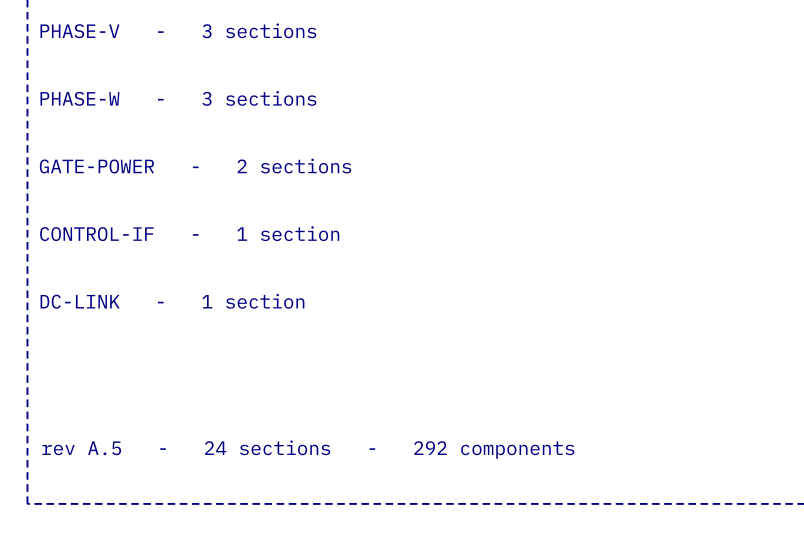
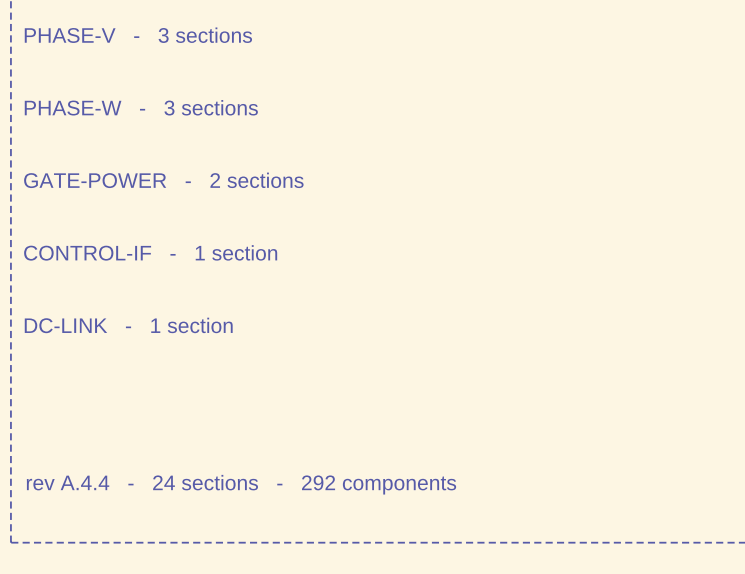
text: rev A.5 - 24 sections - 292 components (308, 449) -> rev A.4.4 - 24 sections - 292 components (241, 484)

